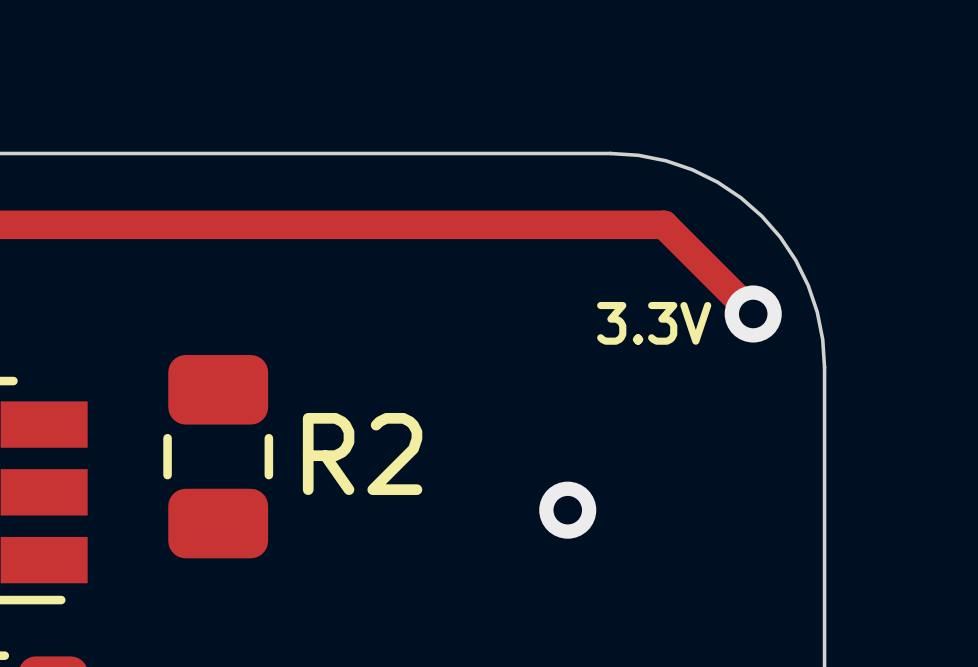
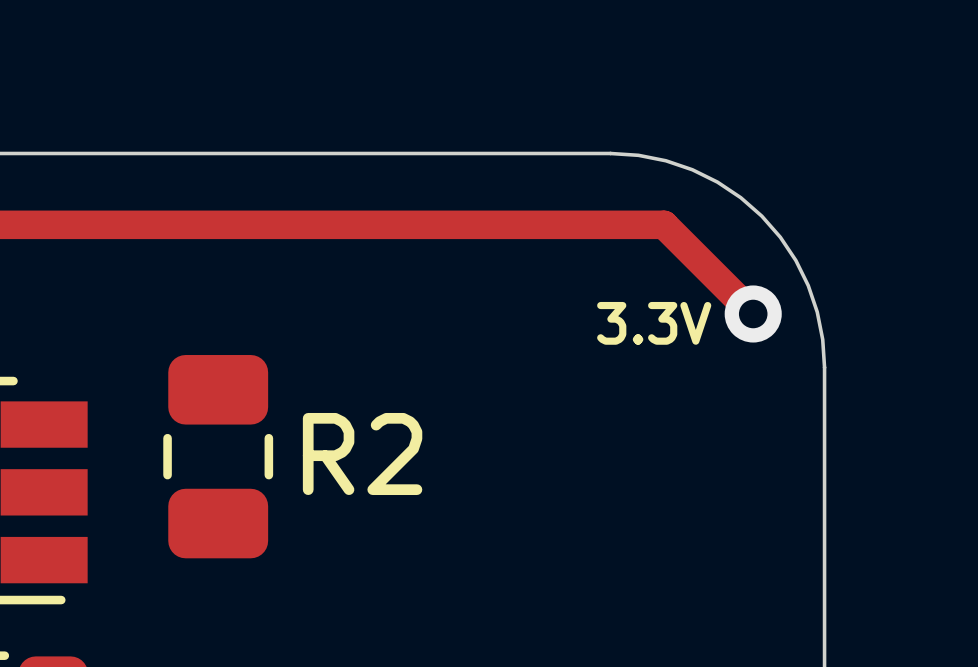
via: (567, 510) -> none

